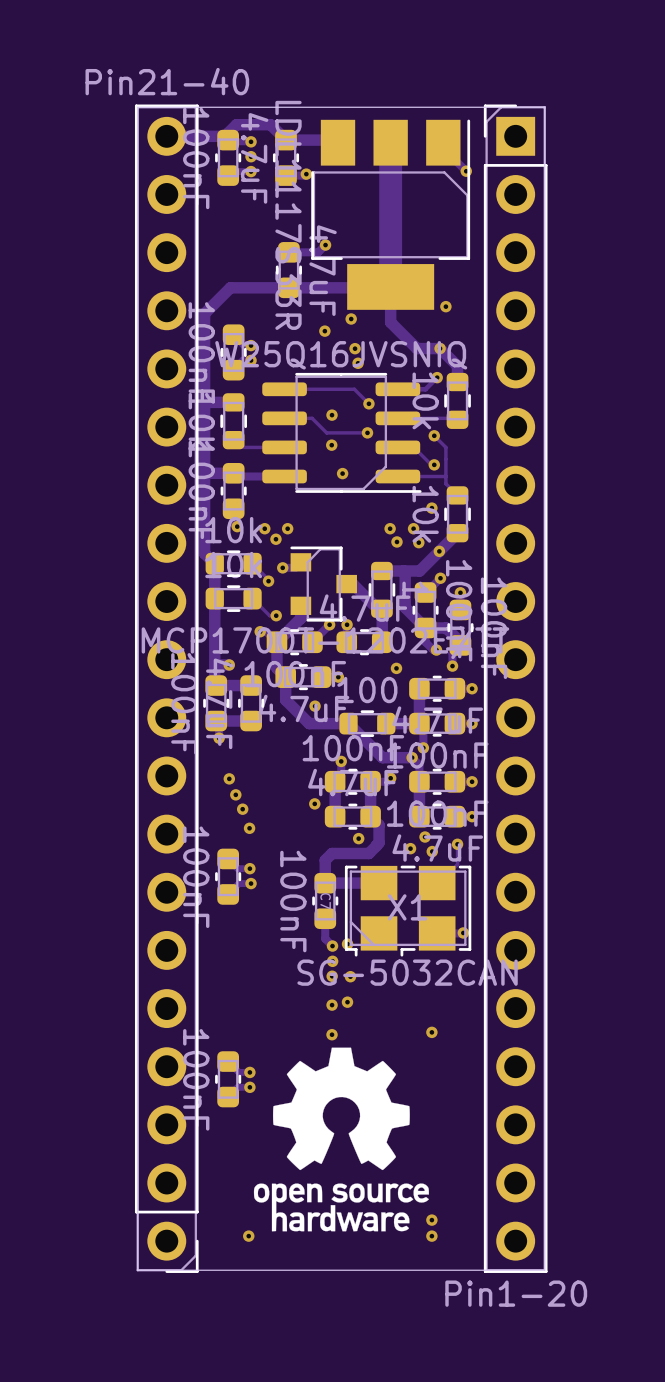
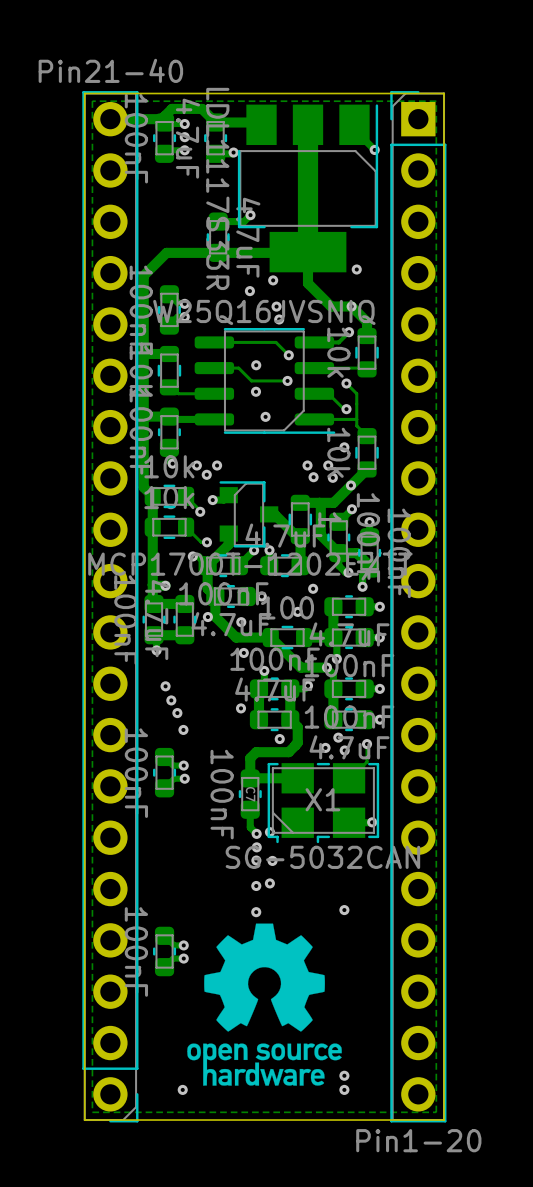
zone outline: none -> (436, 101) (436, 1112) (92, 1112) (92, 101) (436, 101)
via: none -> (297, 611)
via: none -> (207, 617)
via: none -> (243, 652)

